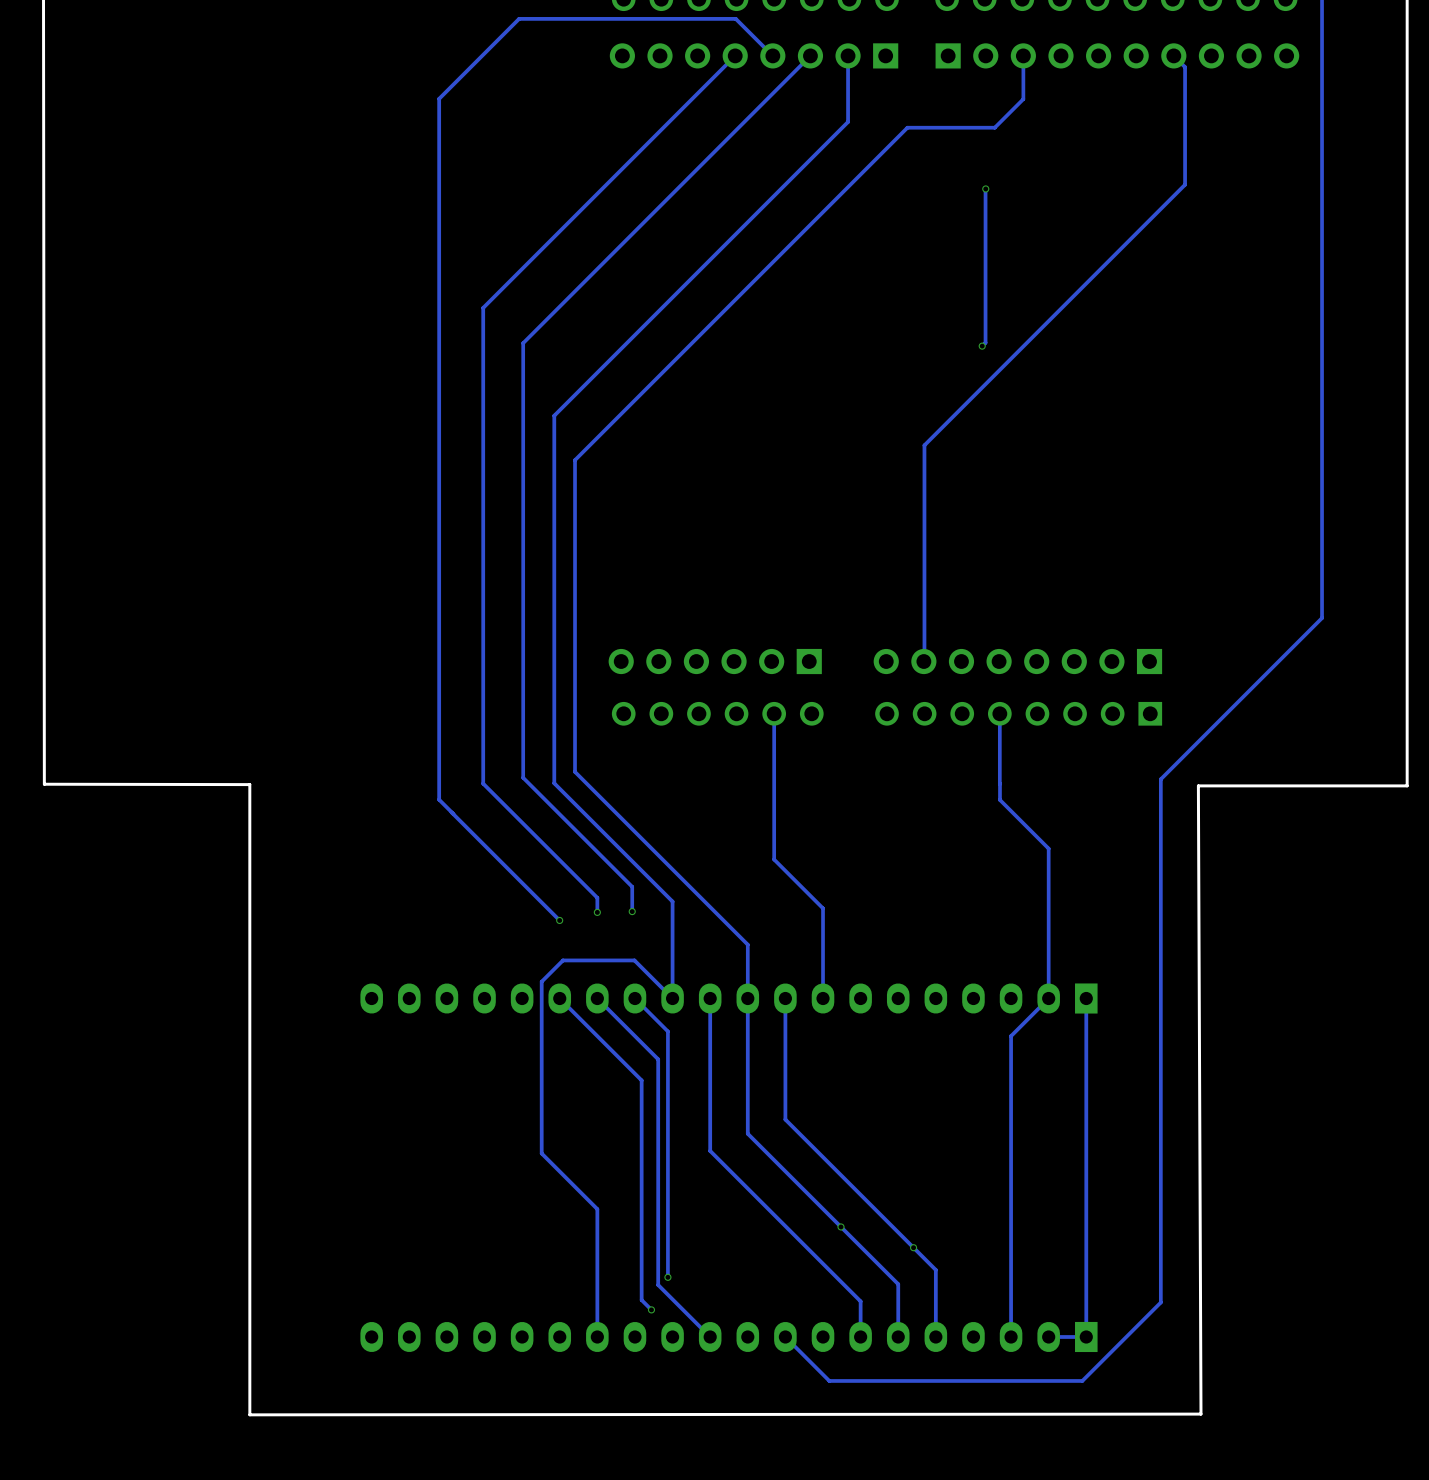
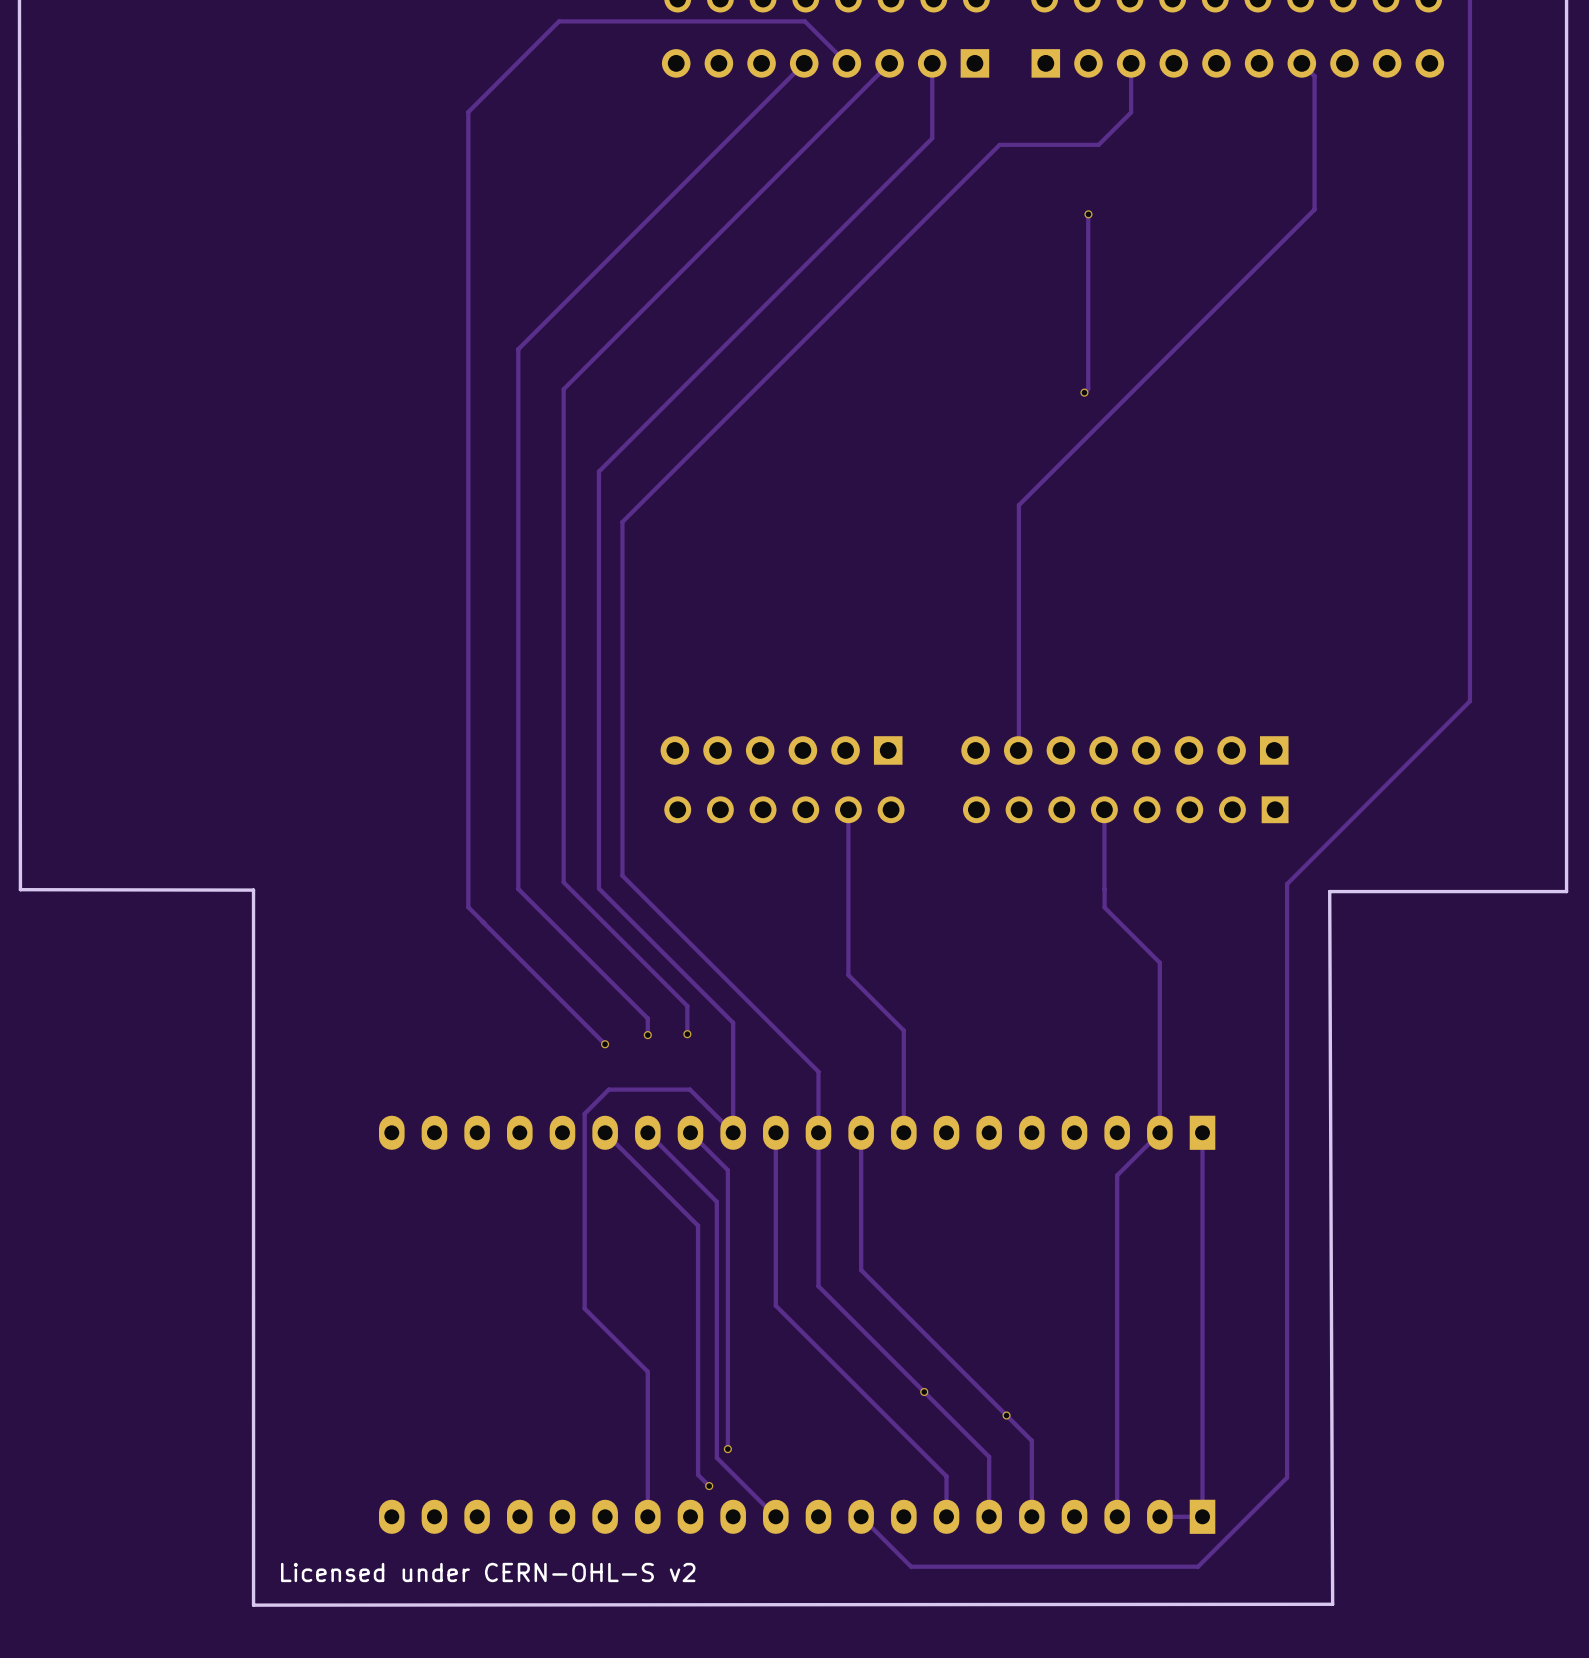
text: none -> Licensed under CERN-OHL-S v2 (488, 1572)

